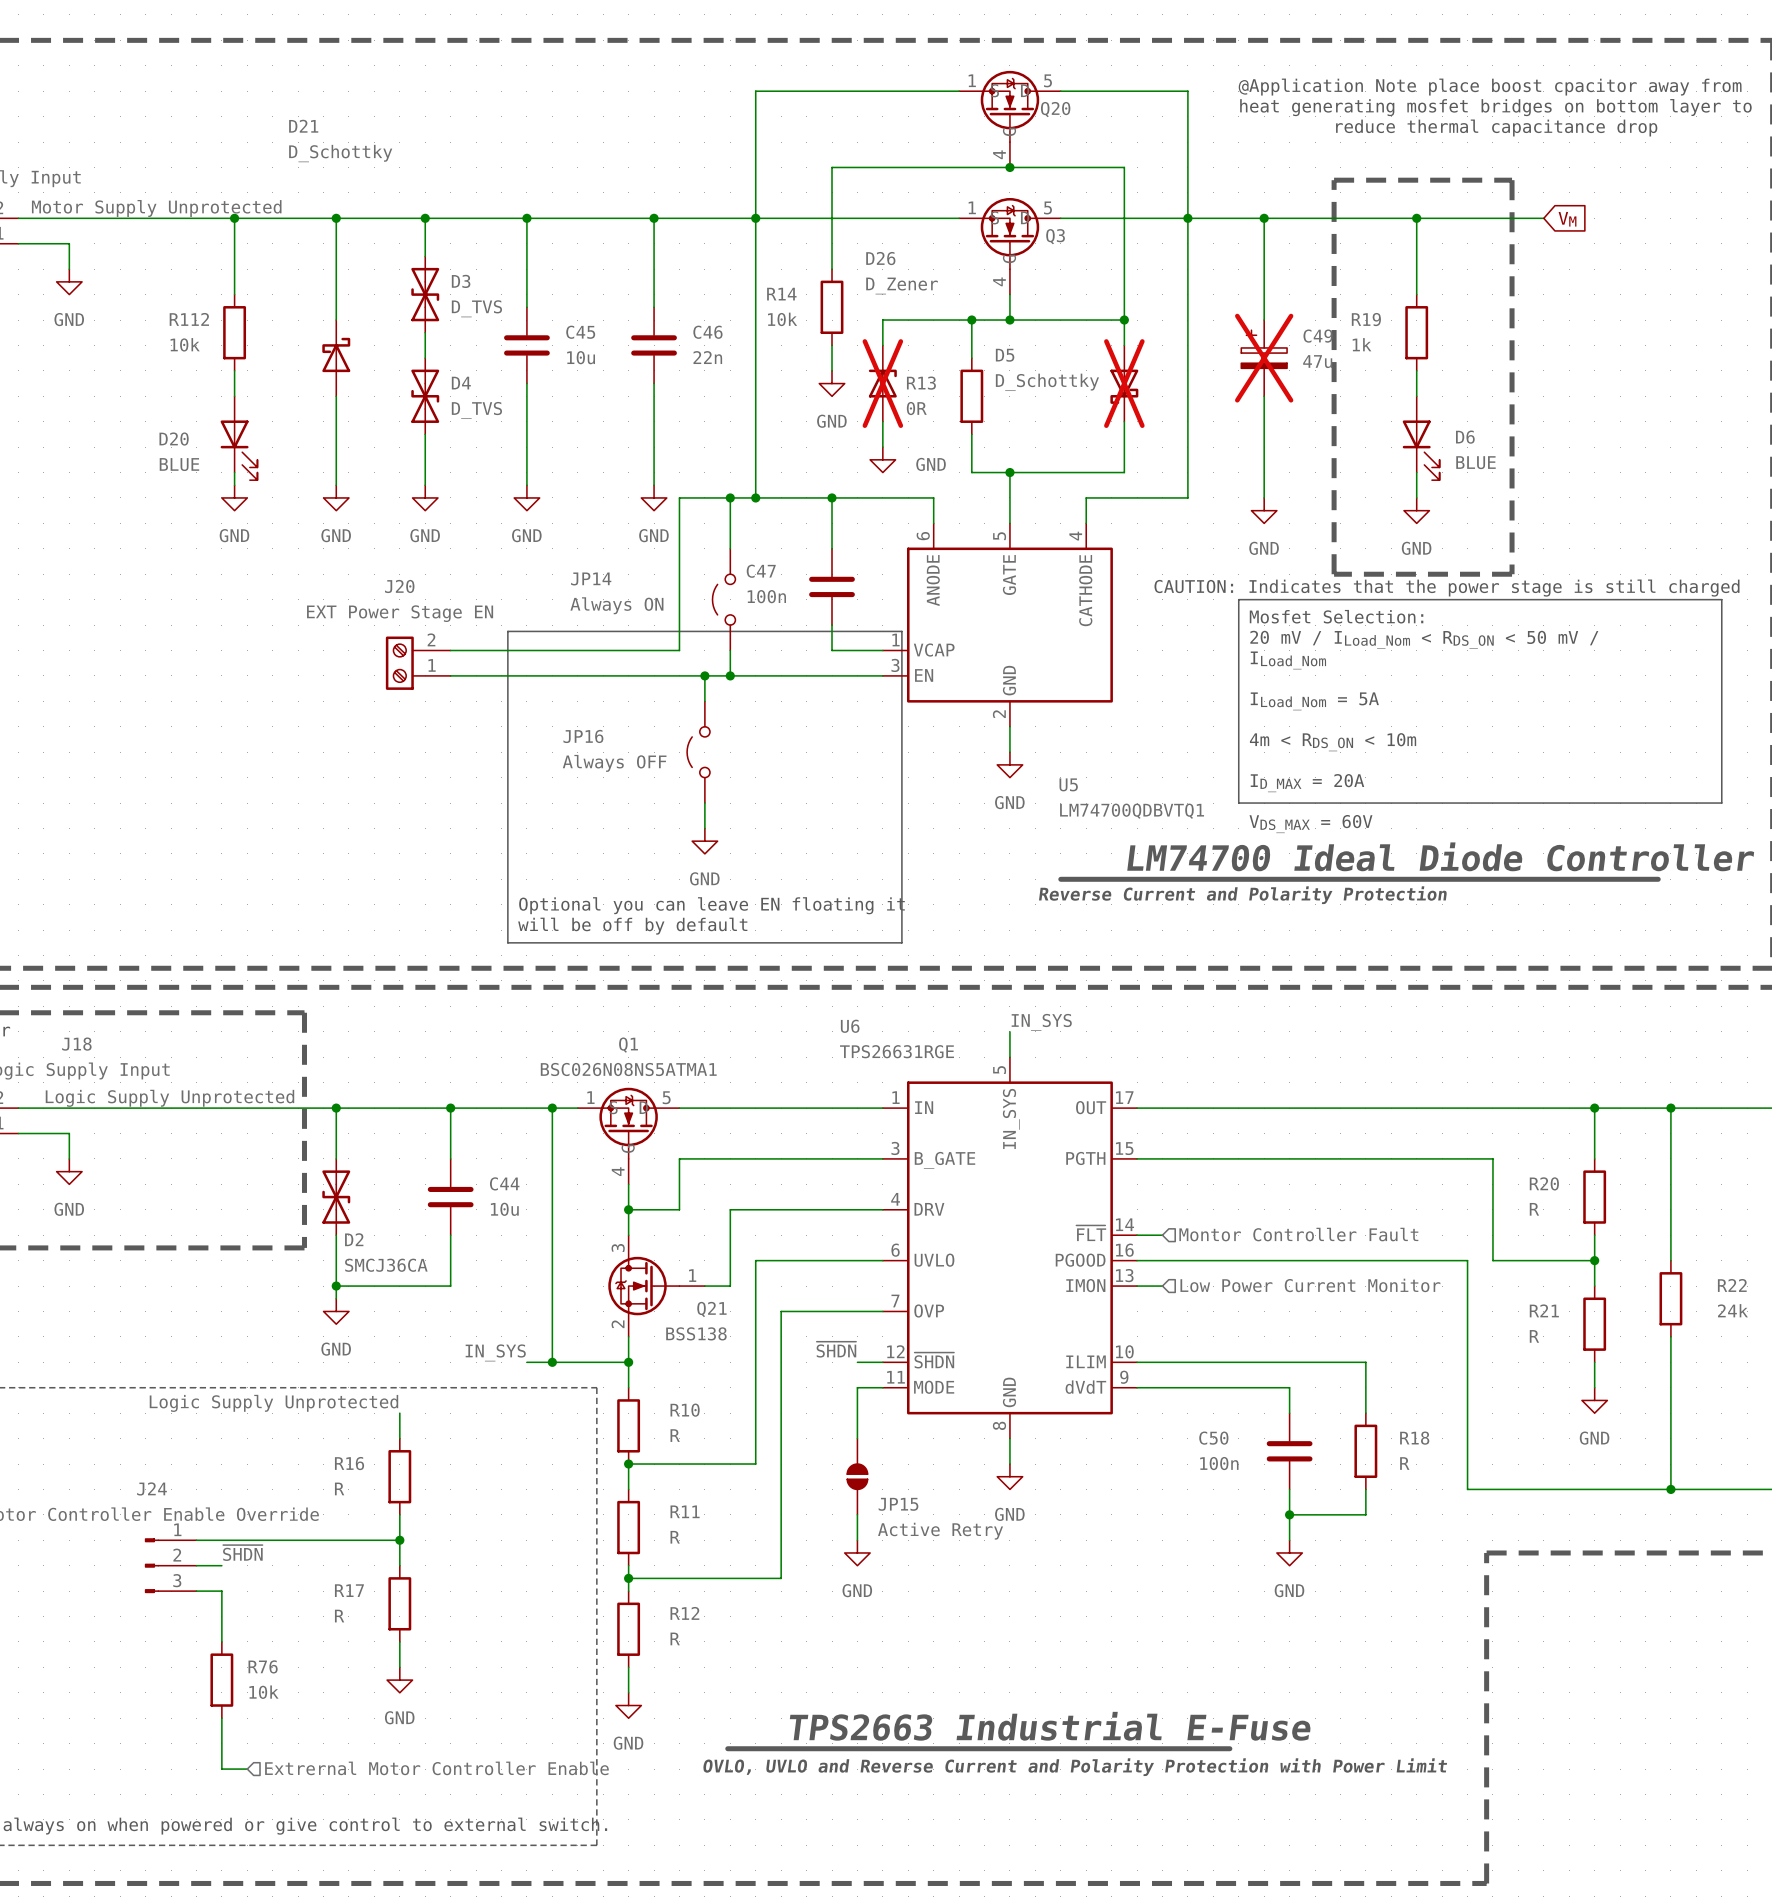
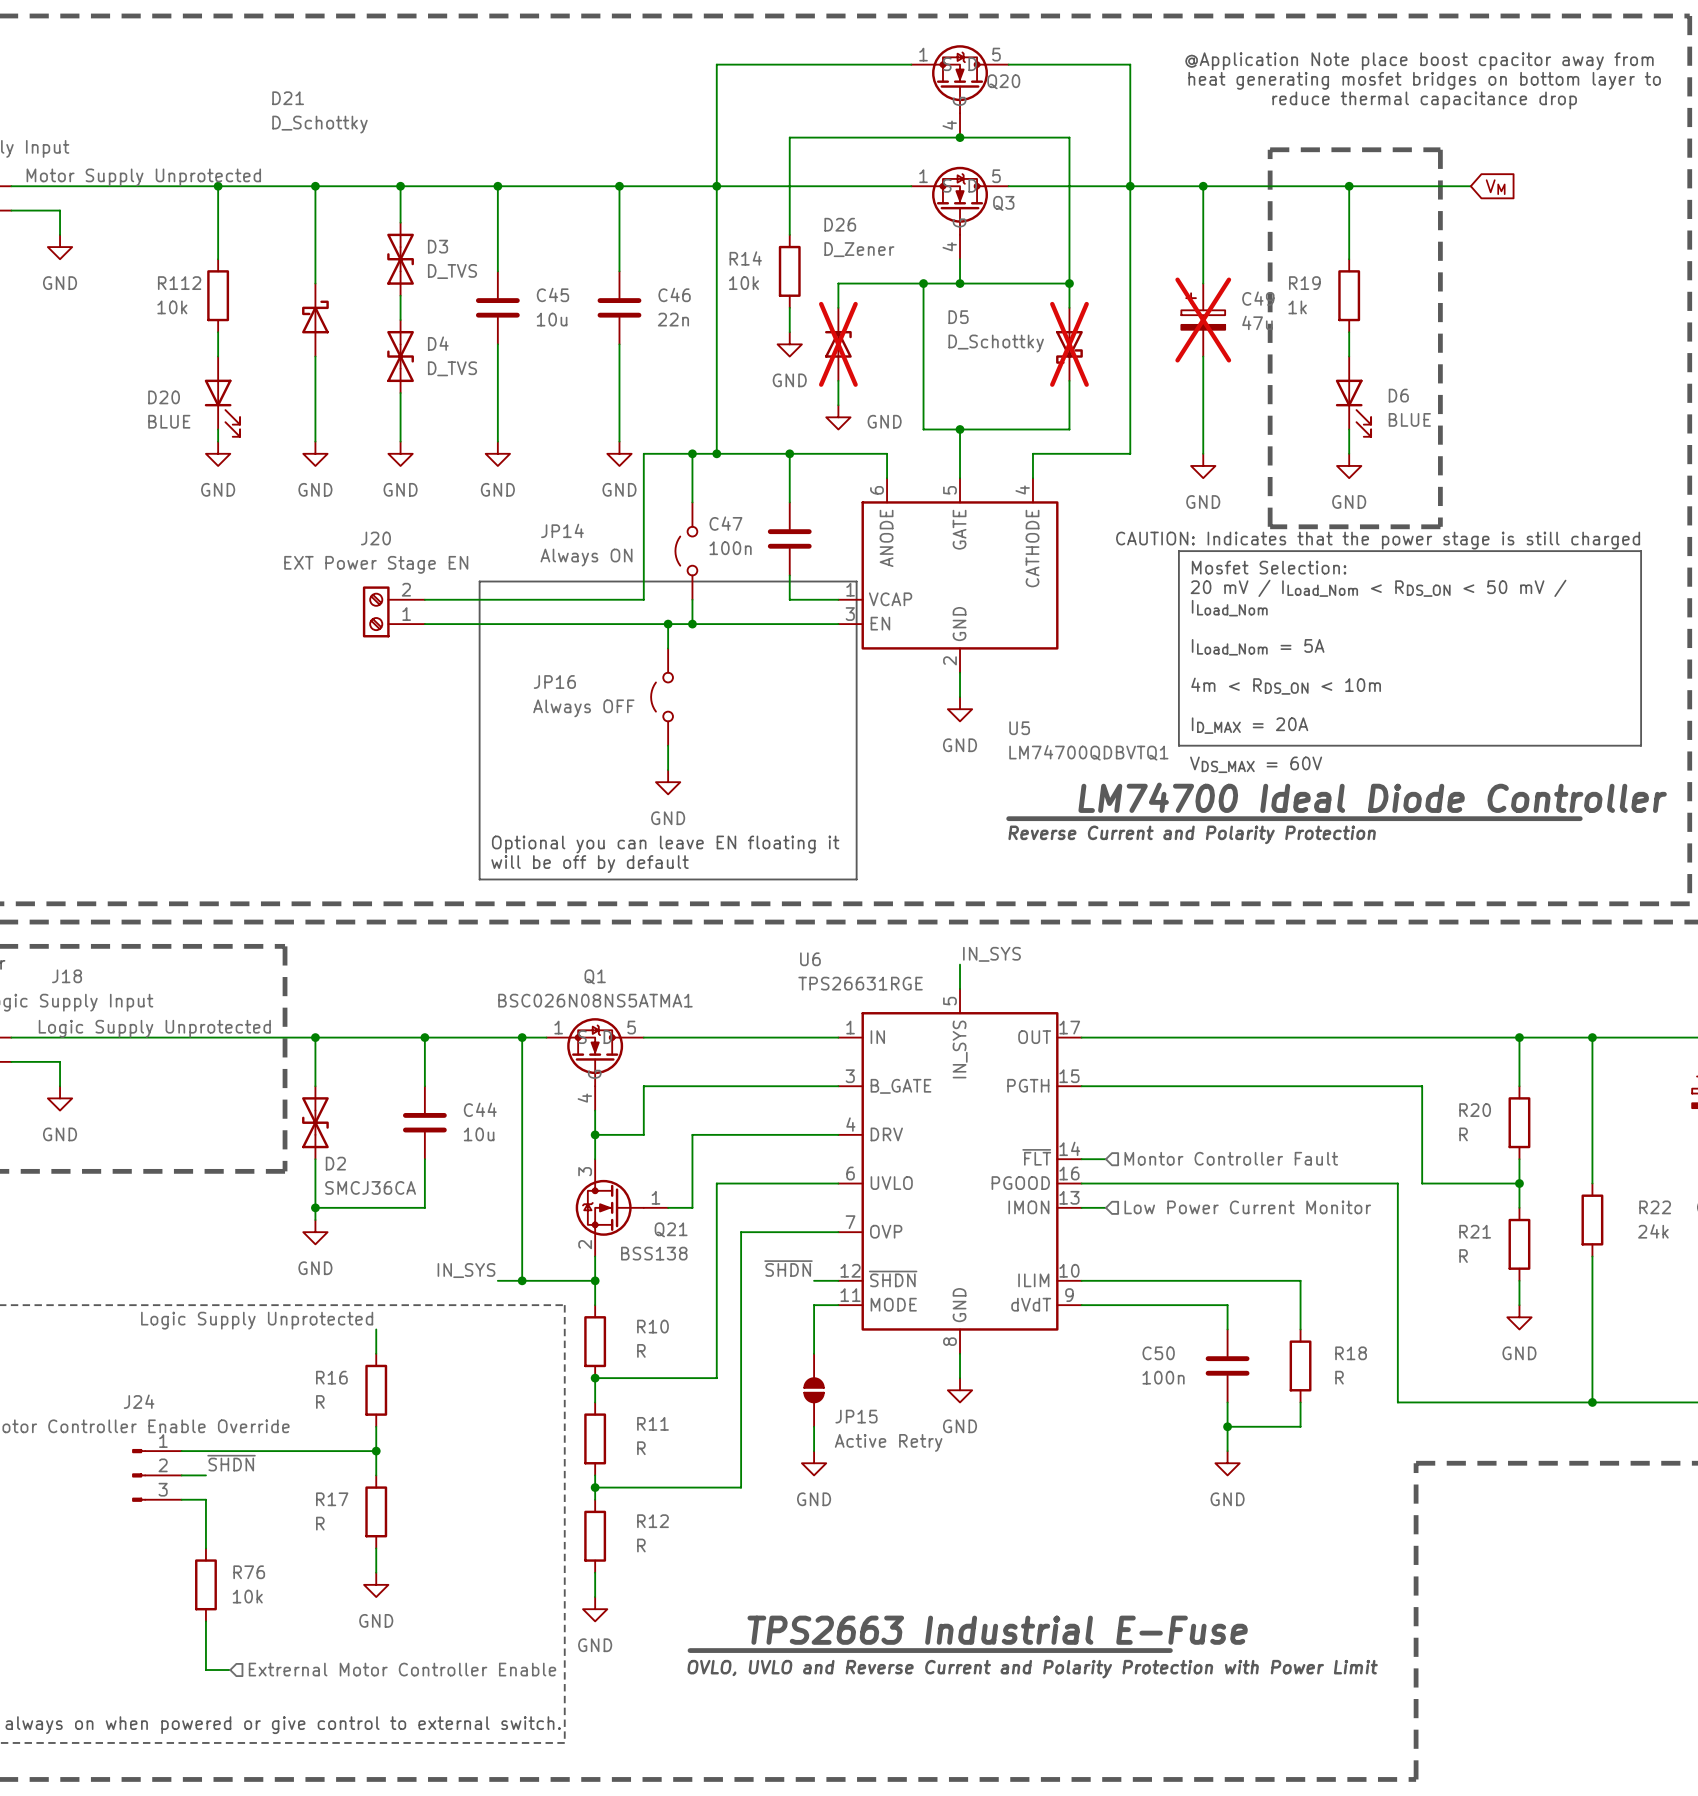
wire: none -> (923, 320) (923, 393)
R13: 0R (971, 396) -> none

